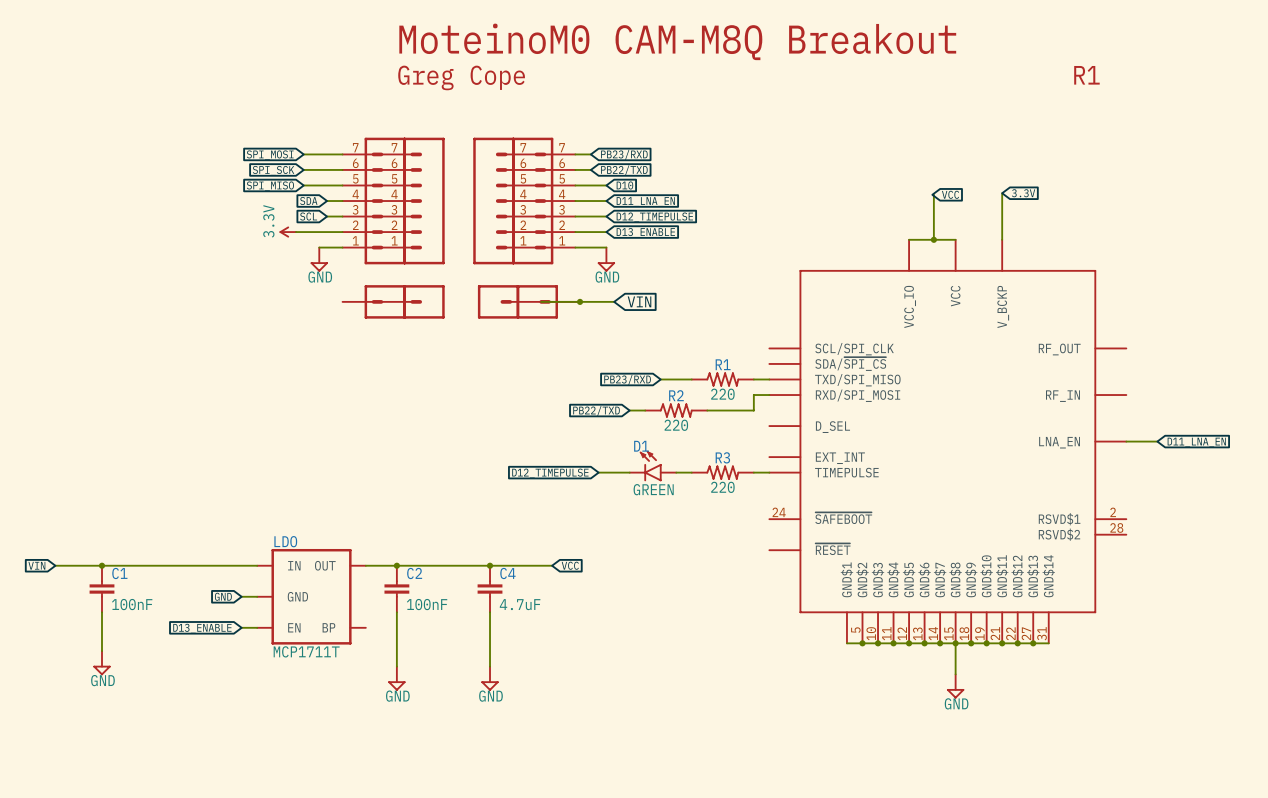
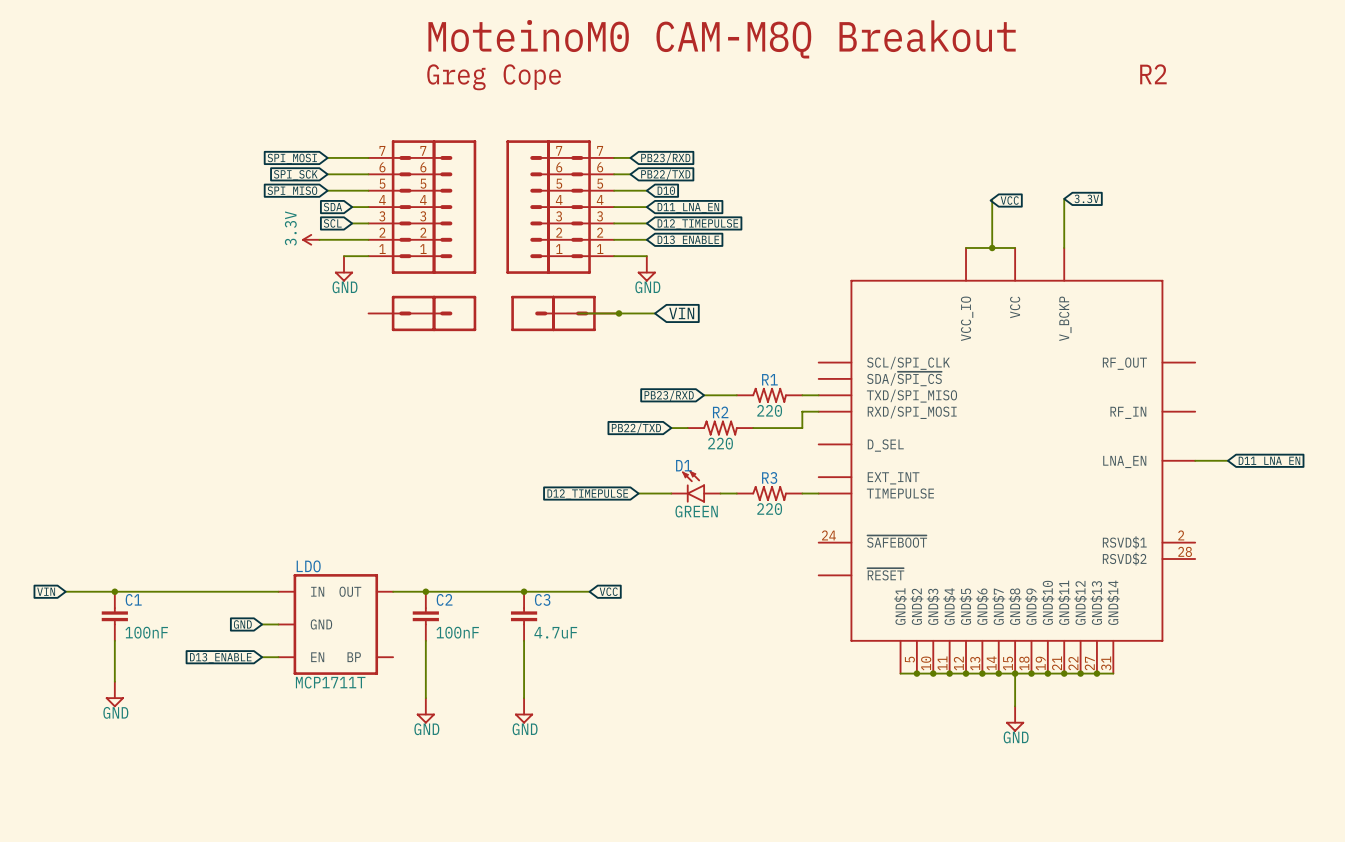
text: R1 (1086, 75) -> R2 (1153, 74)
C4 name: C4 (507, 573) -> C3 (542, 599)

